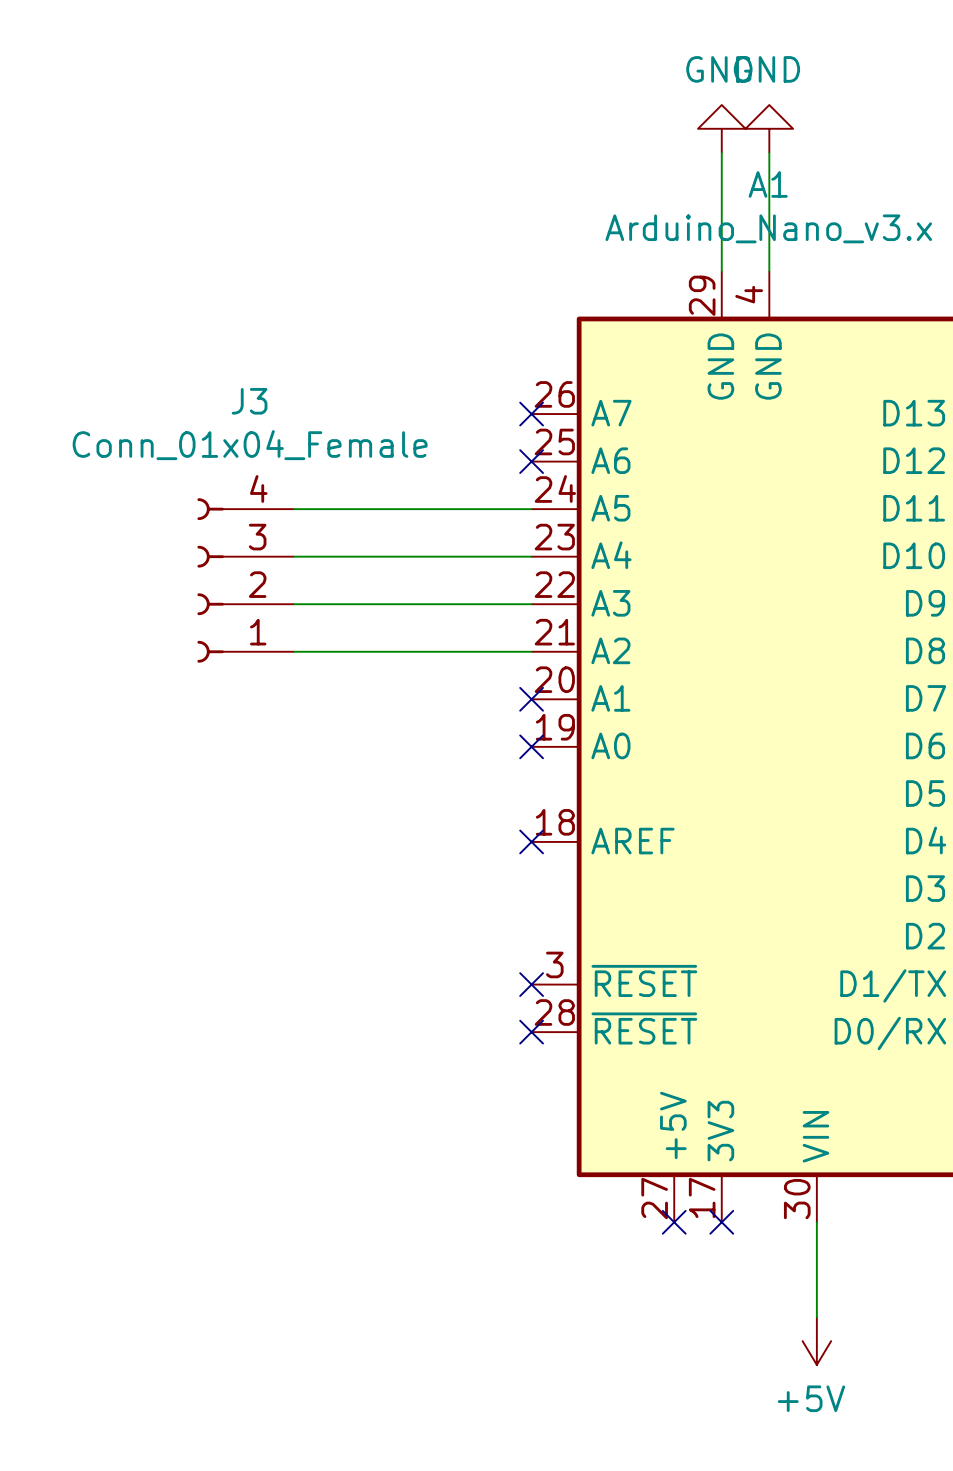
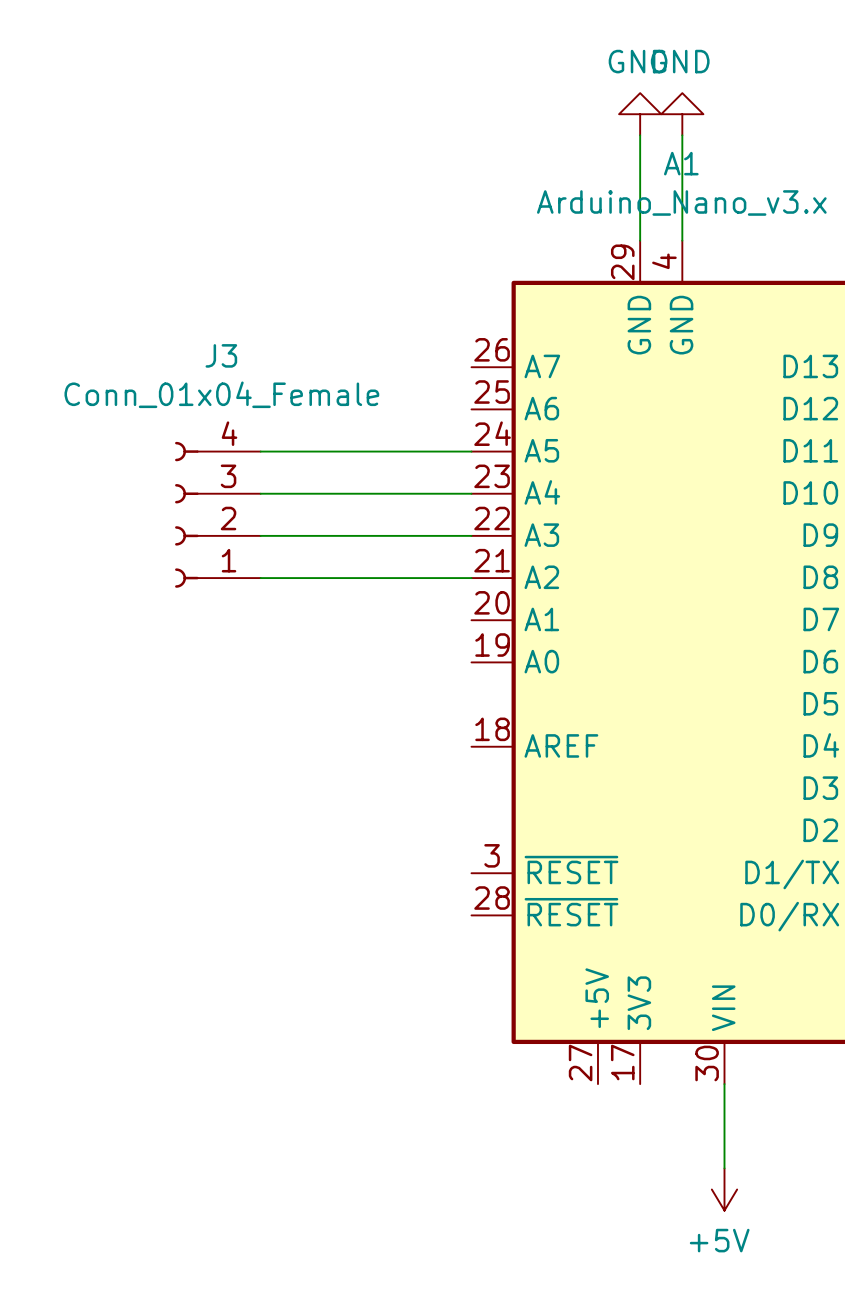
no-connect mark: (531, 414) -> none
no-connect mark: (531, 461) -> none
no-connect mark: (531, 699) -> none
no-connect mark: (531, 746) -> none
no-connect mark: (531, 841) -> none
no-connect mark: (531, 984) -> none
no-connect mark: (531, 1032) -> none
no-connect mark: (674, 1222) -> none
no-connect mark: (721, 1222) -> none

